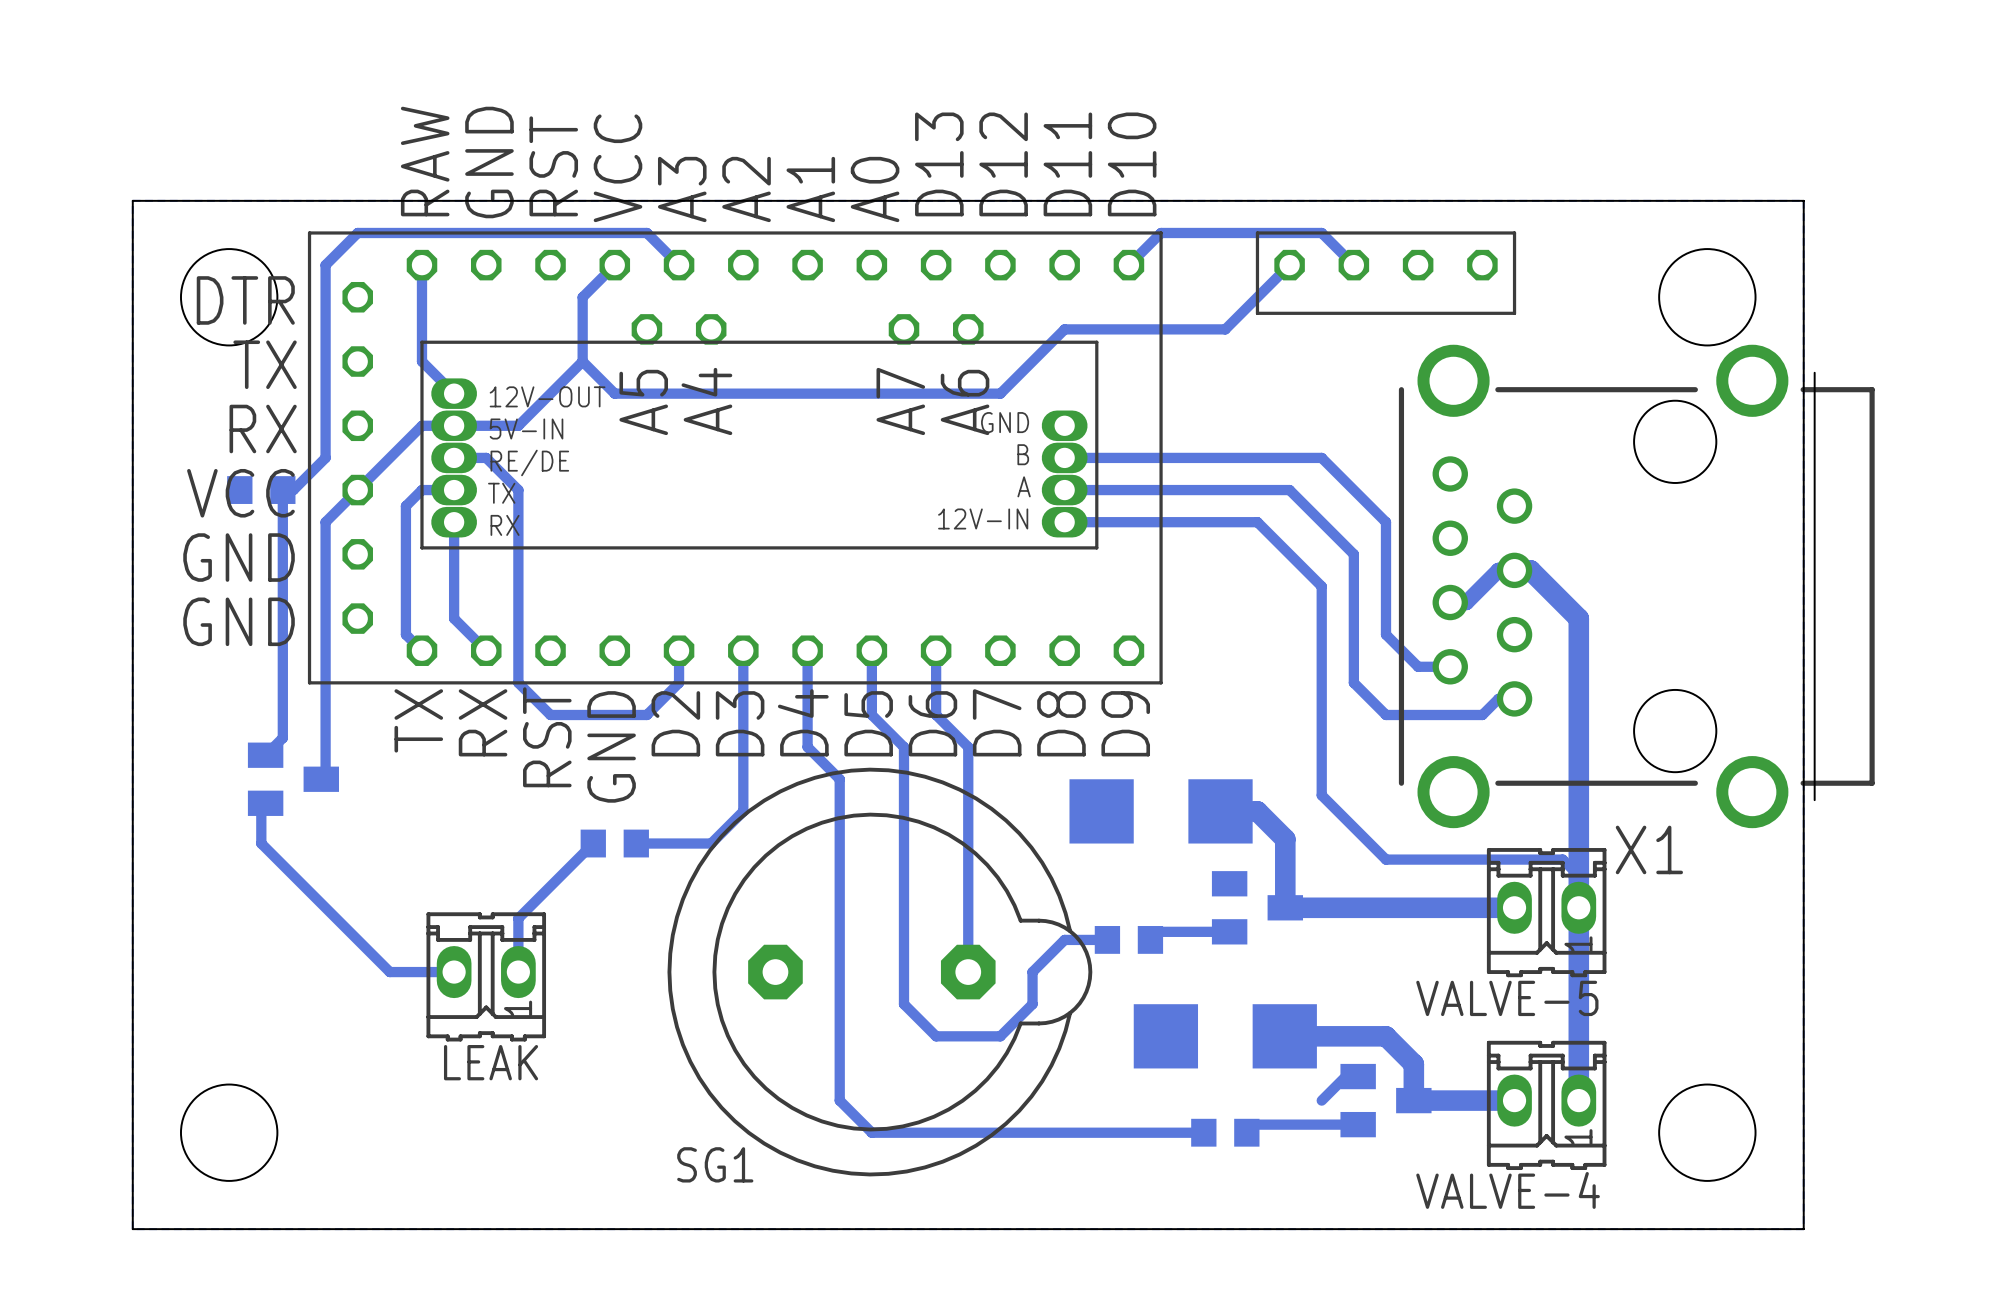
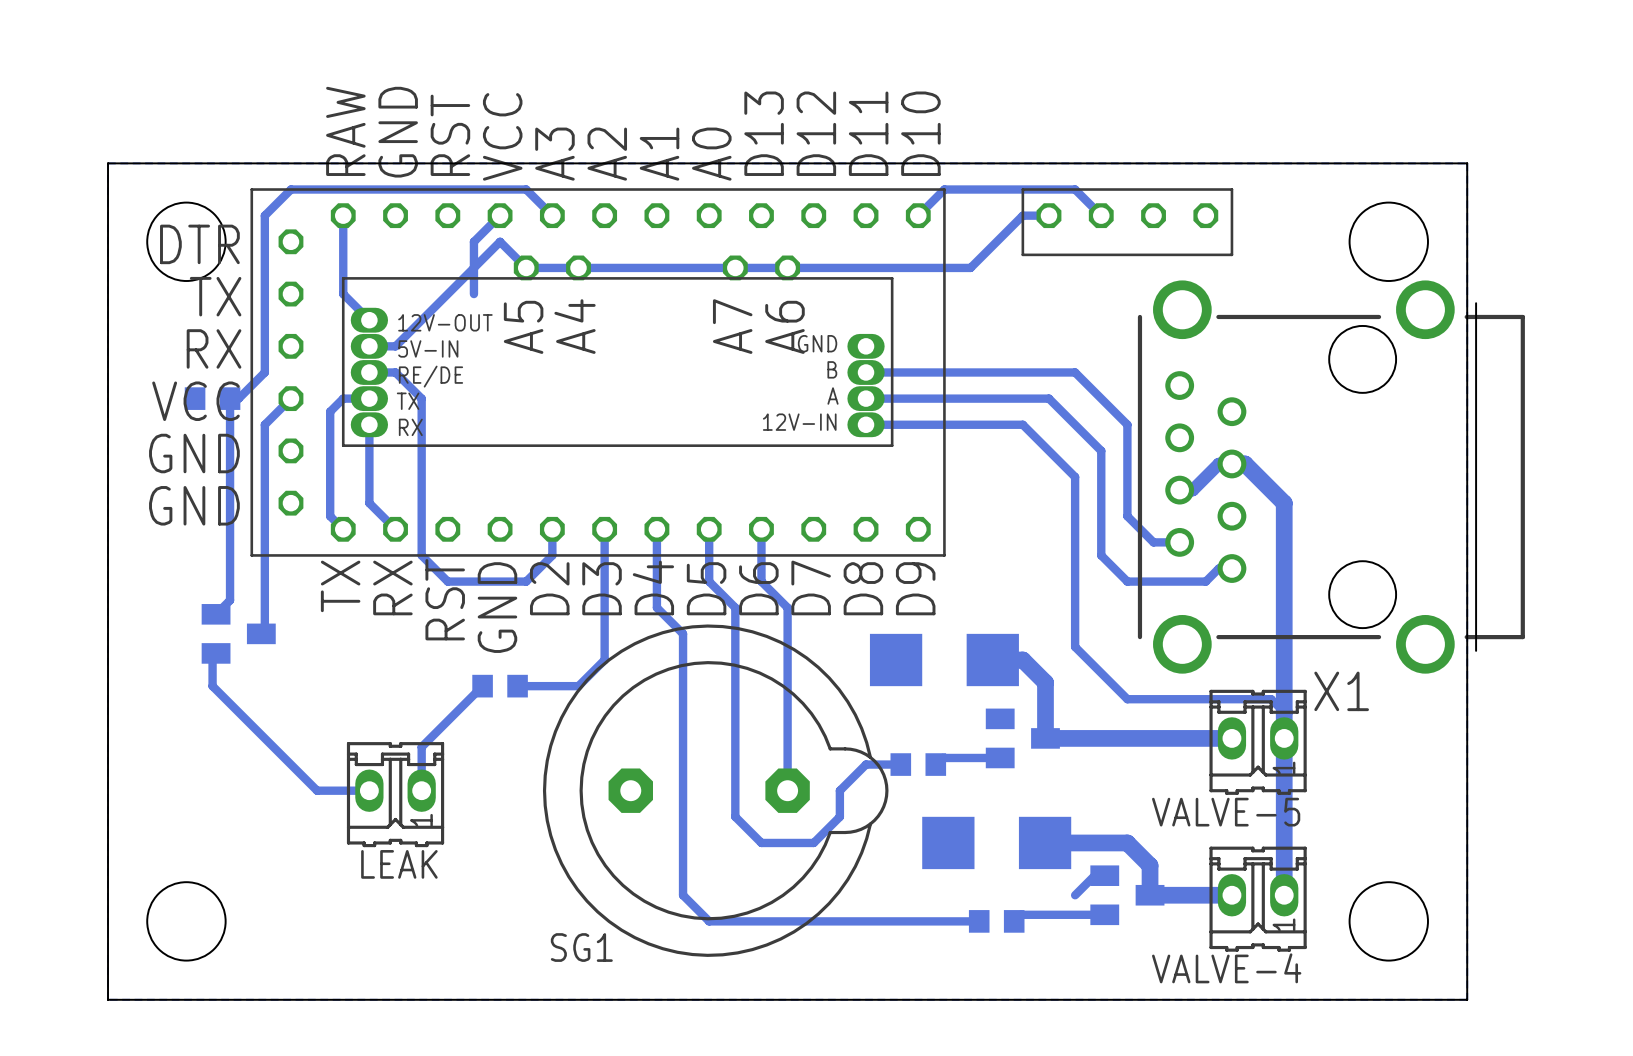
bottom track: (1289, 265) (1225, 329) (1193, 329) -> (1048, 215) (1022, 215) (970, 267)
bottom track: (1064, 329) (1000, 393) (614, 393) (582, 361) (518, 425) (486, 425) -> (866, 267) (526, 267) (500, 241) (395, 346)
bottom track: (454, 425) (421, 425) (357, 490) -> none

